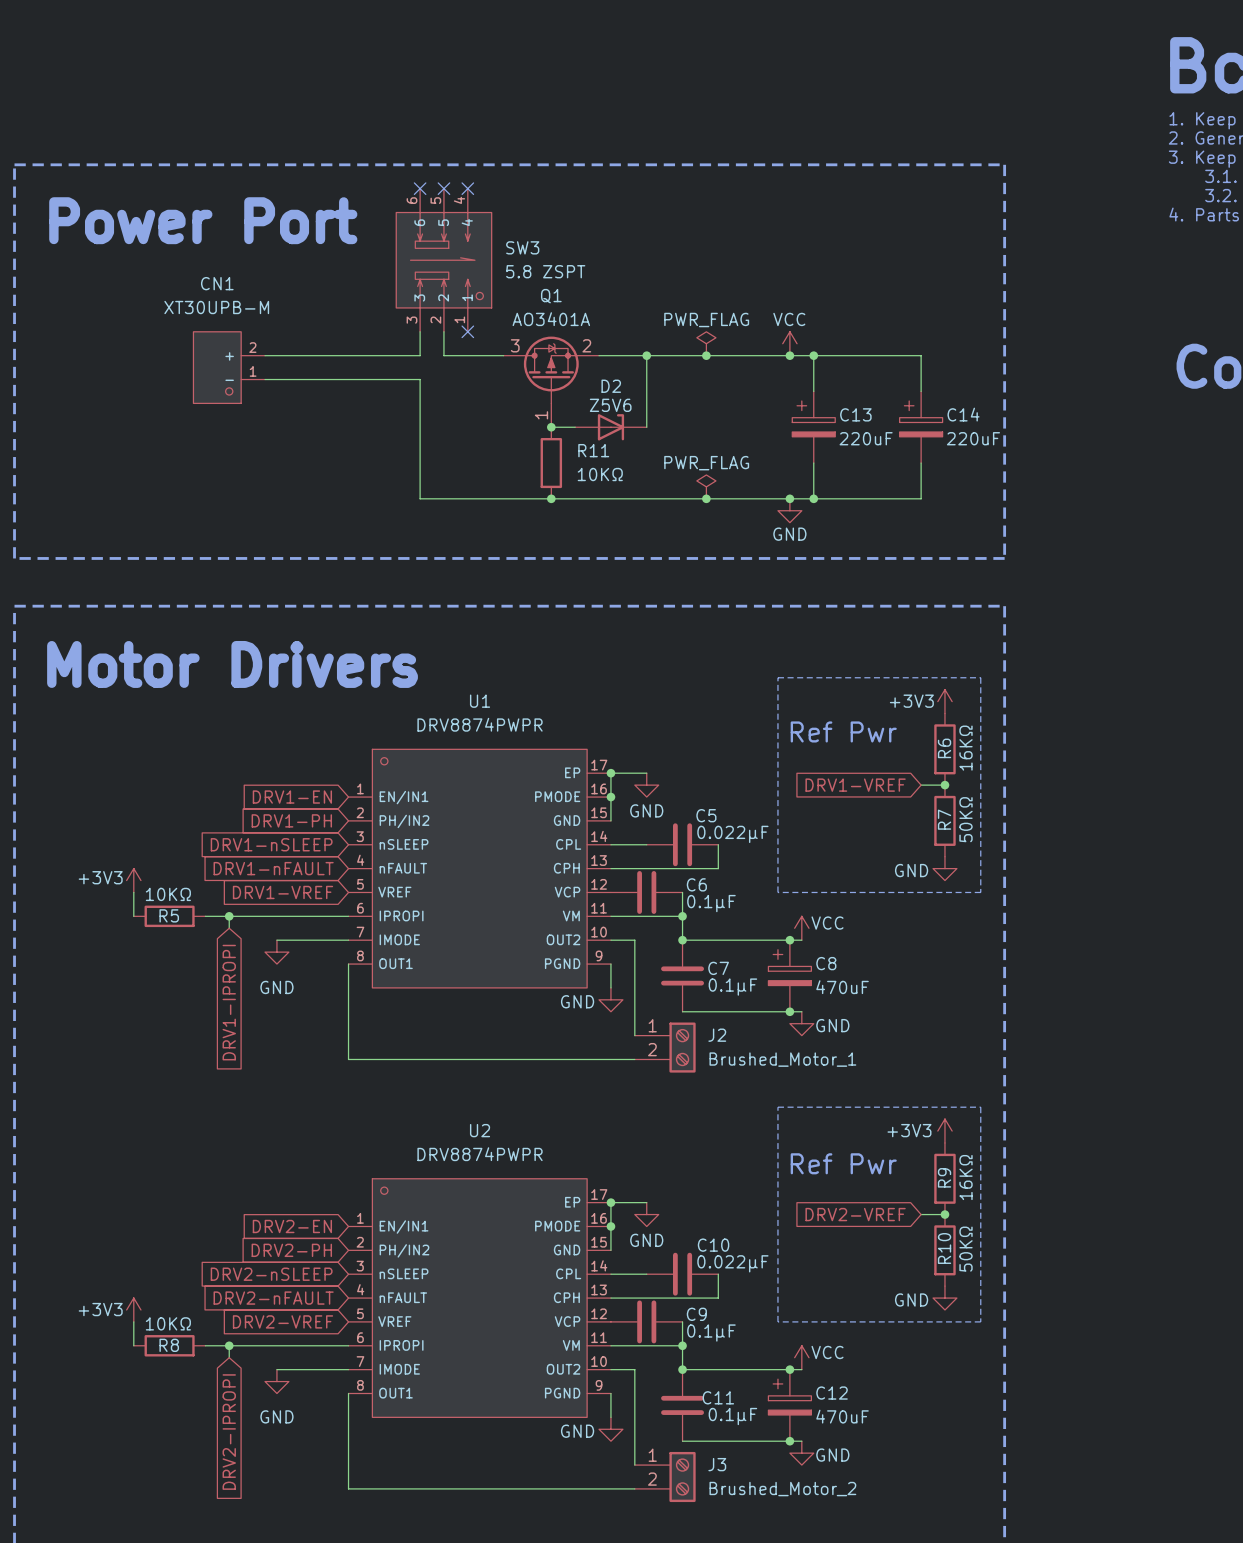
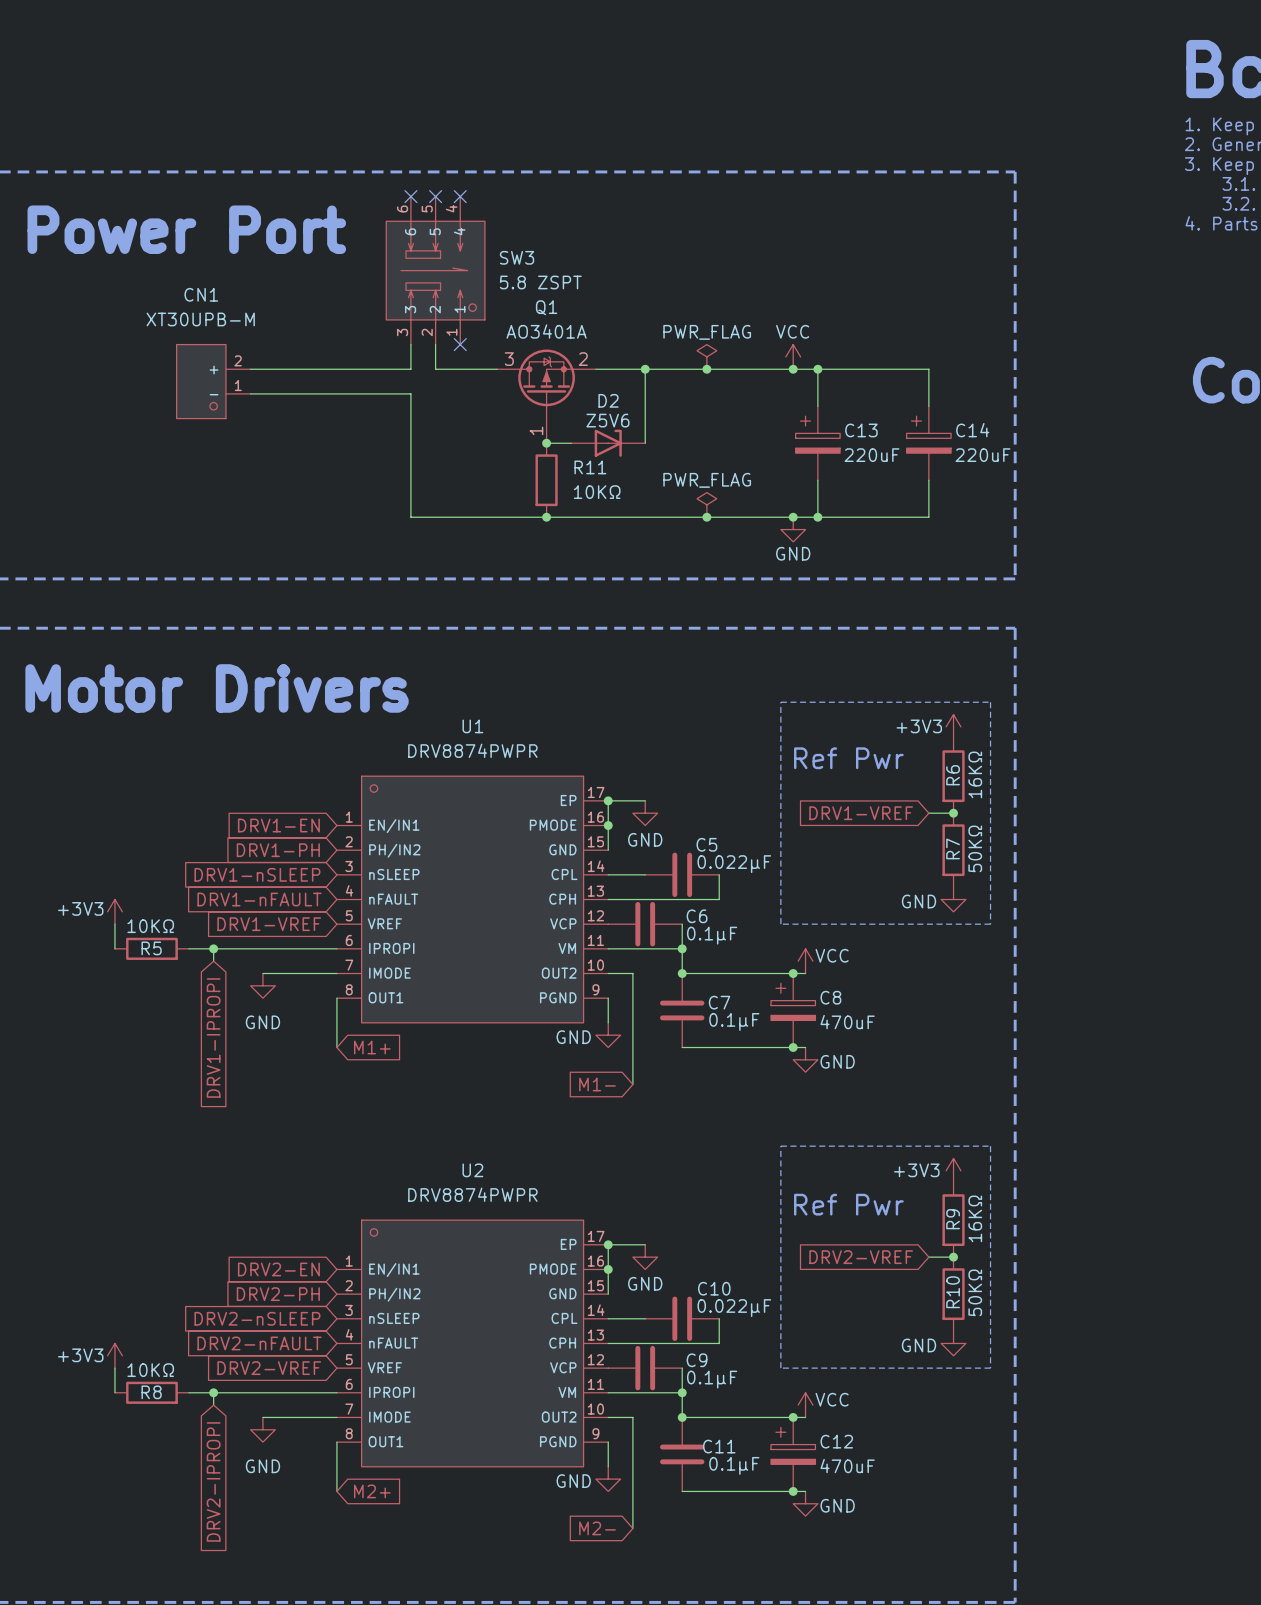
wire: (348, 1011) (348, 1059) (634, 1059) -> none
global label: none -> M1+ (372, 1047)
wire: none -> (632, 1072) (632, 1084)
global label: none -> M1- (597, 1084)
J2: Brushed_Motor_1 (665, 1047) -> none
wire: (348, 1441) (348, 1488) (634, 1488) -> none
global label: none -> M2+ (372, 1491)
wire: none -> (632, 1516) (632, 1528)
global label: none -> M2- (597, 1528)
J3: Brushed_Motor_2 (665, 1476) -> none

